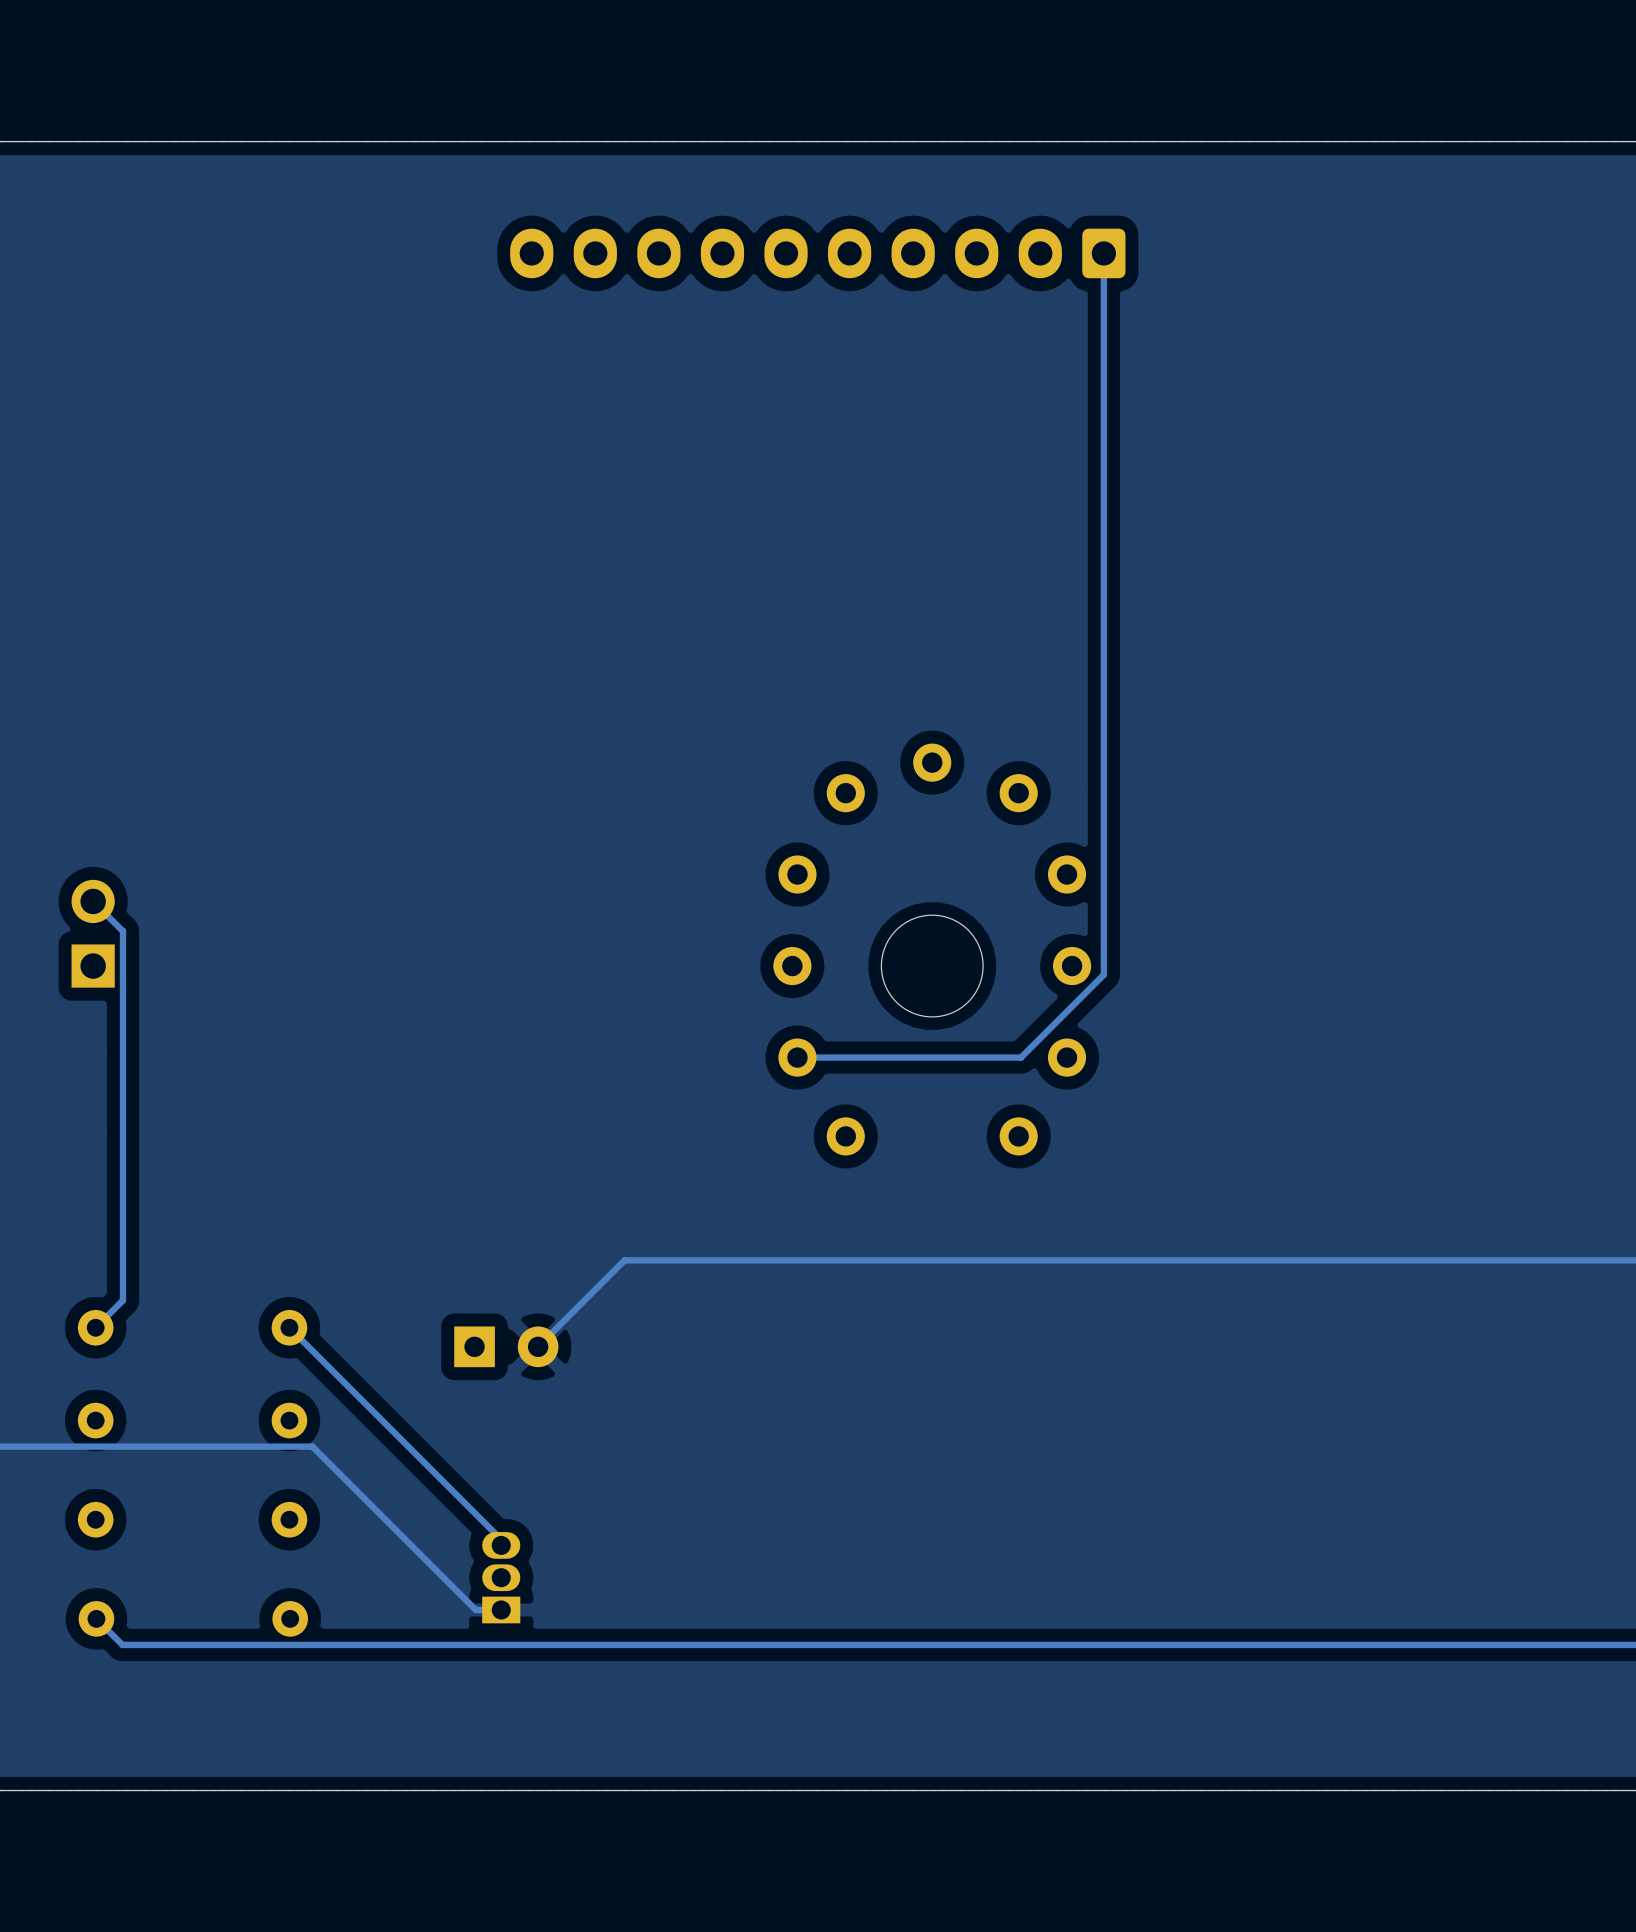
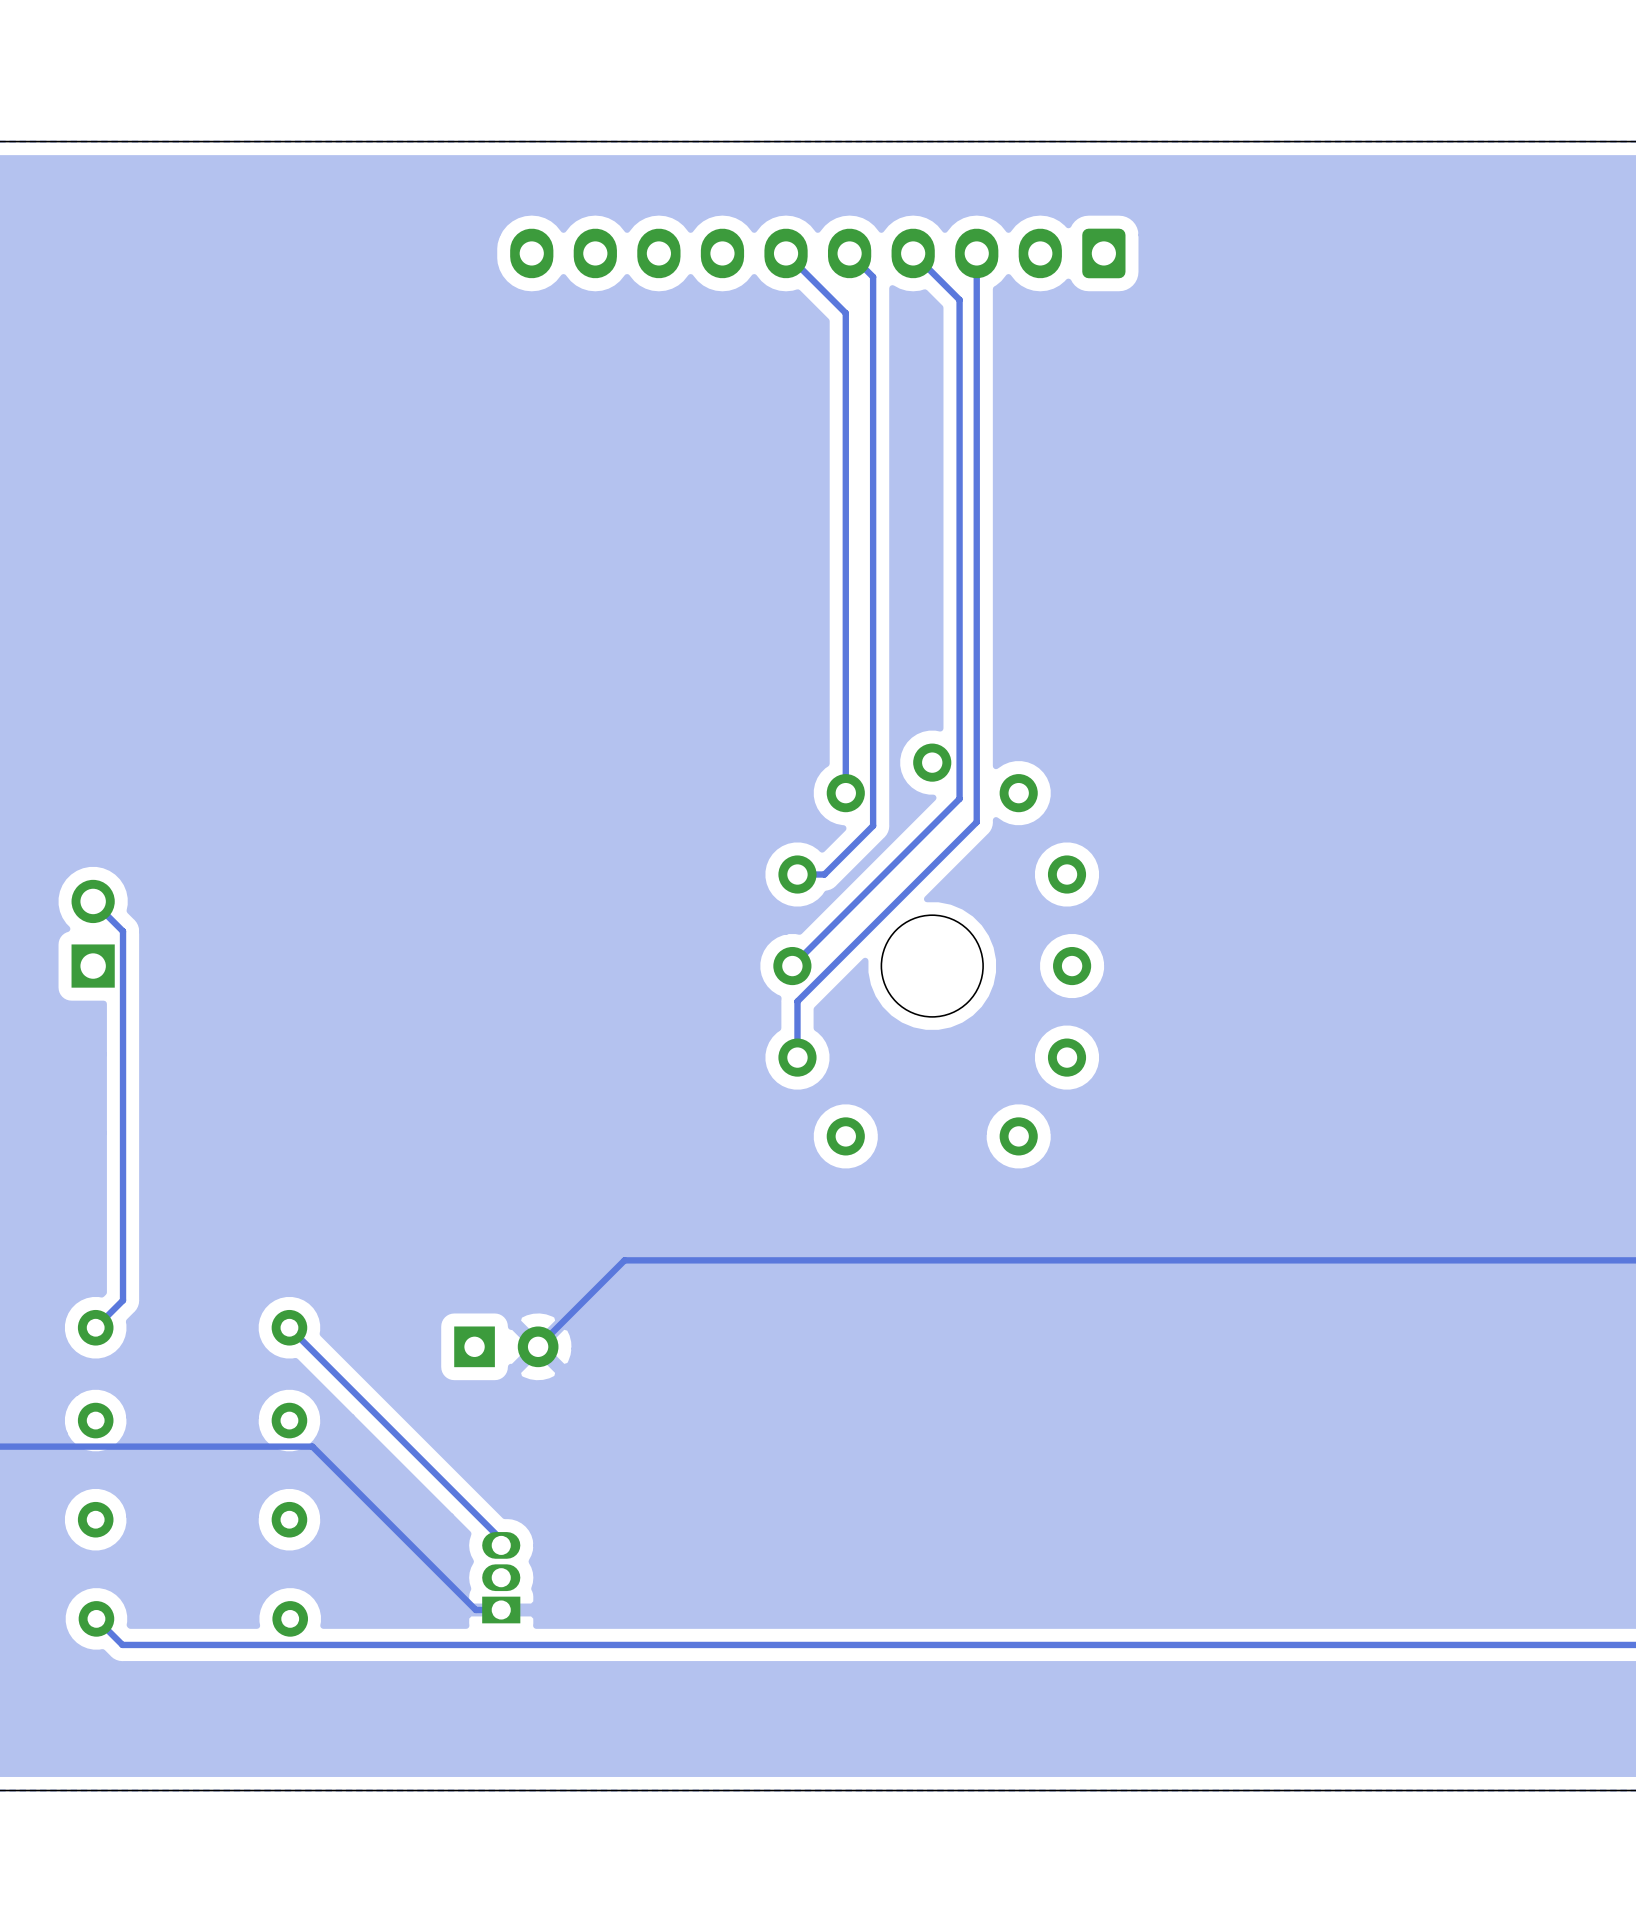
track: none -> (786, 253) (845, 313) (845, 793)
track: none -> (849, 253) (873, 276) (873, 825) (824, 874) (804, 874)
track: none -> (913, 253) (959, 299) (959, 798) (792, 966)
track: (1103, 253) (1103, 974) (1021, 1057) (797, 1057) -> (976, 253) (976, 822) (797, 1001) (797, 1057)

